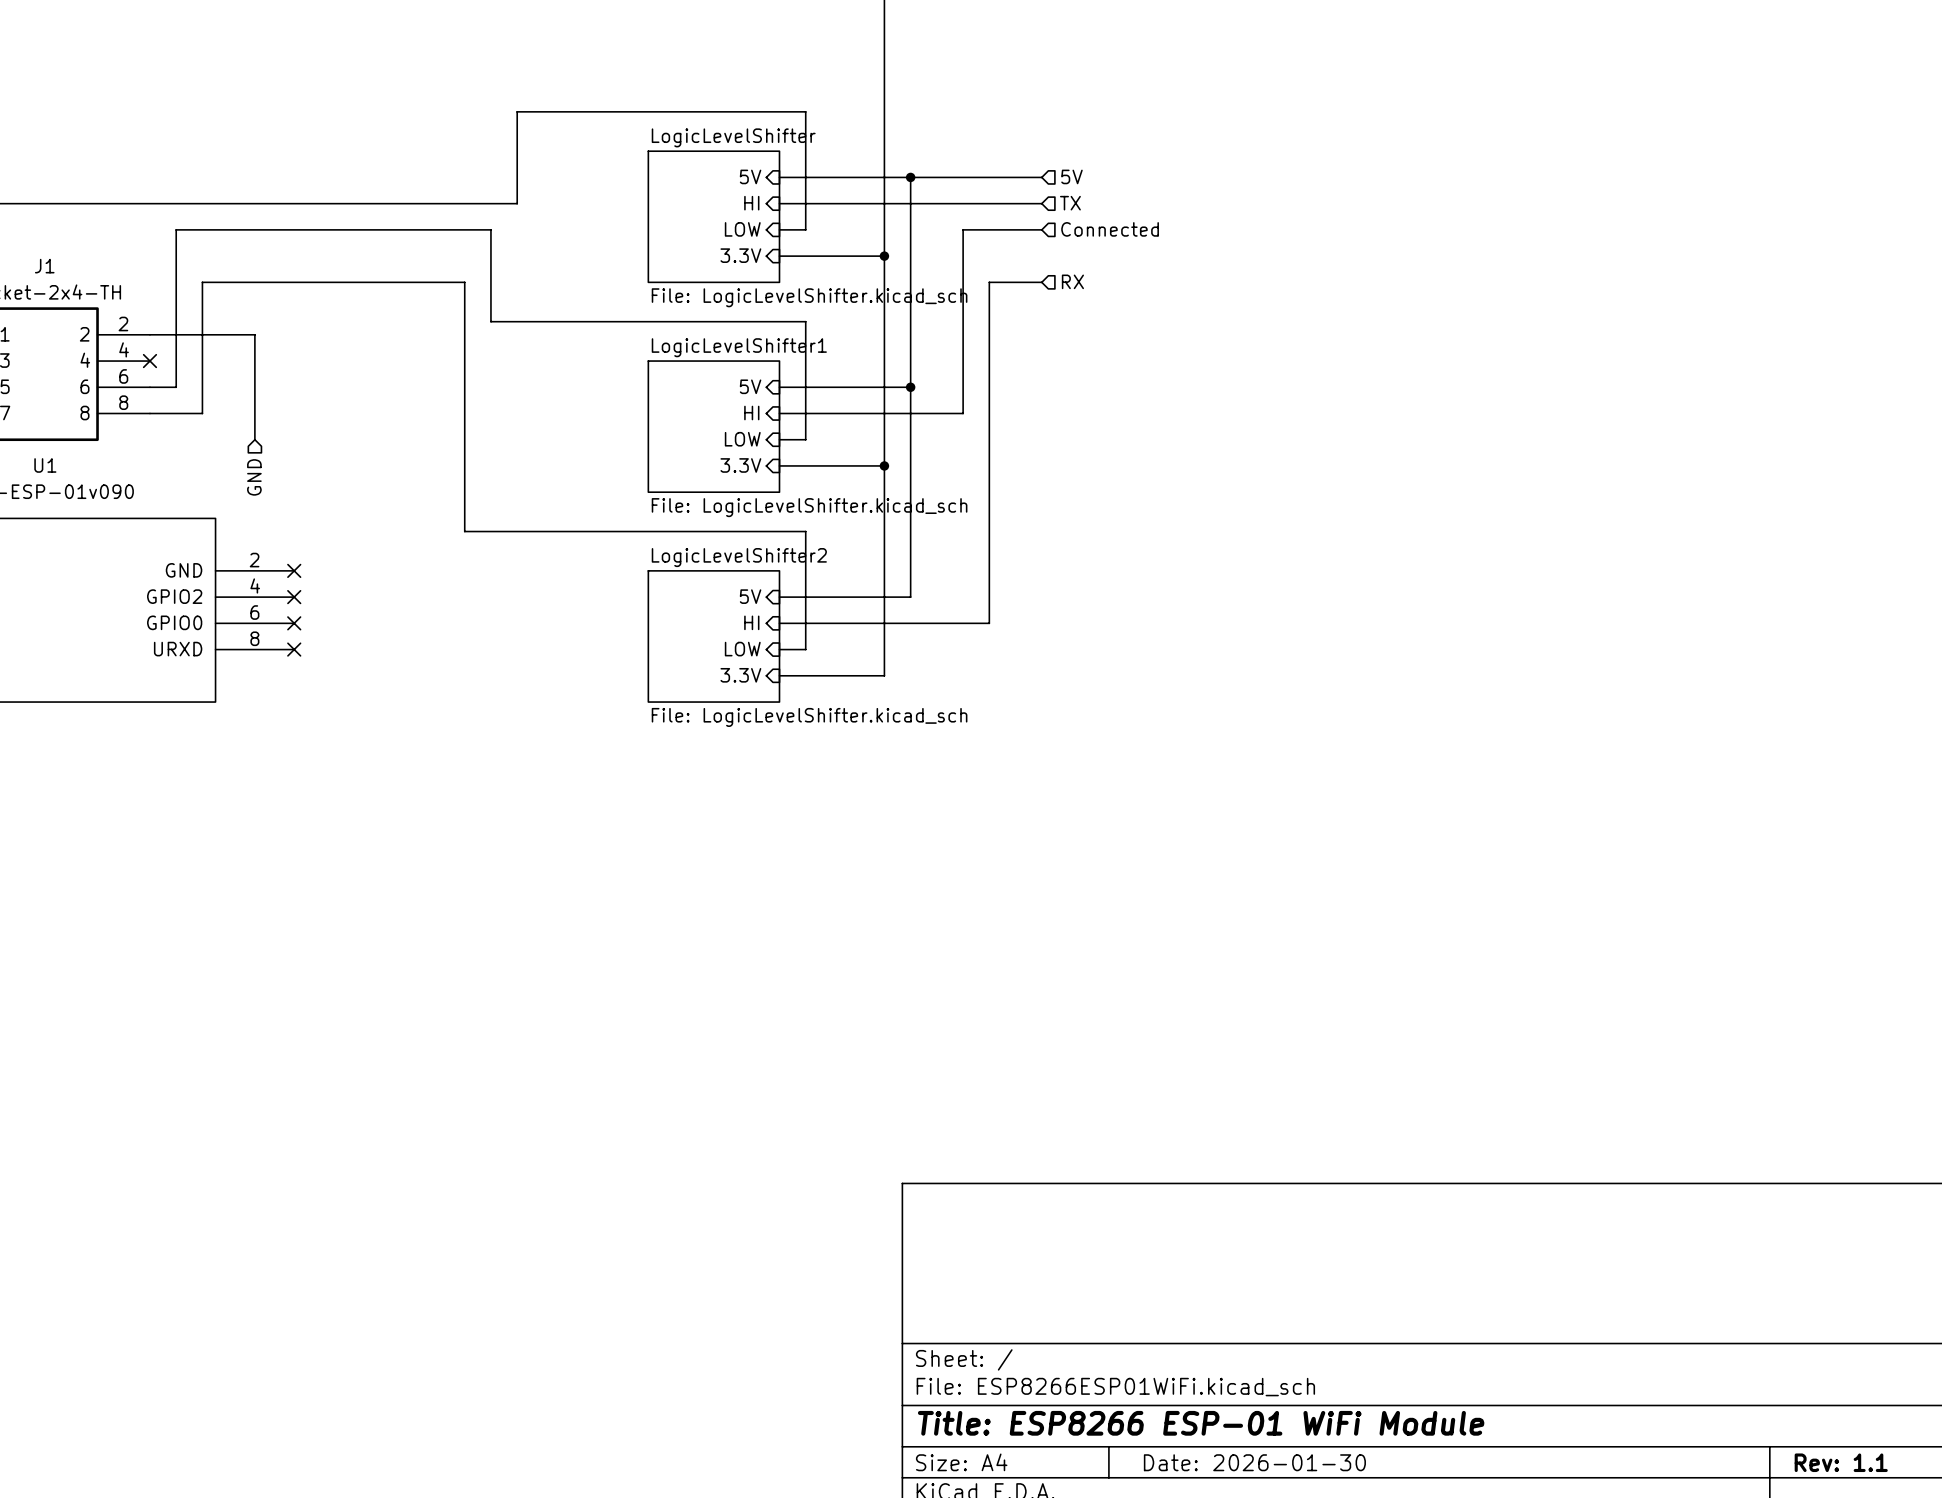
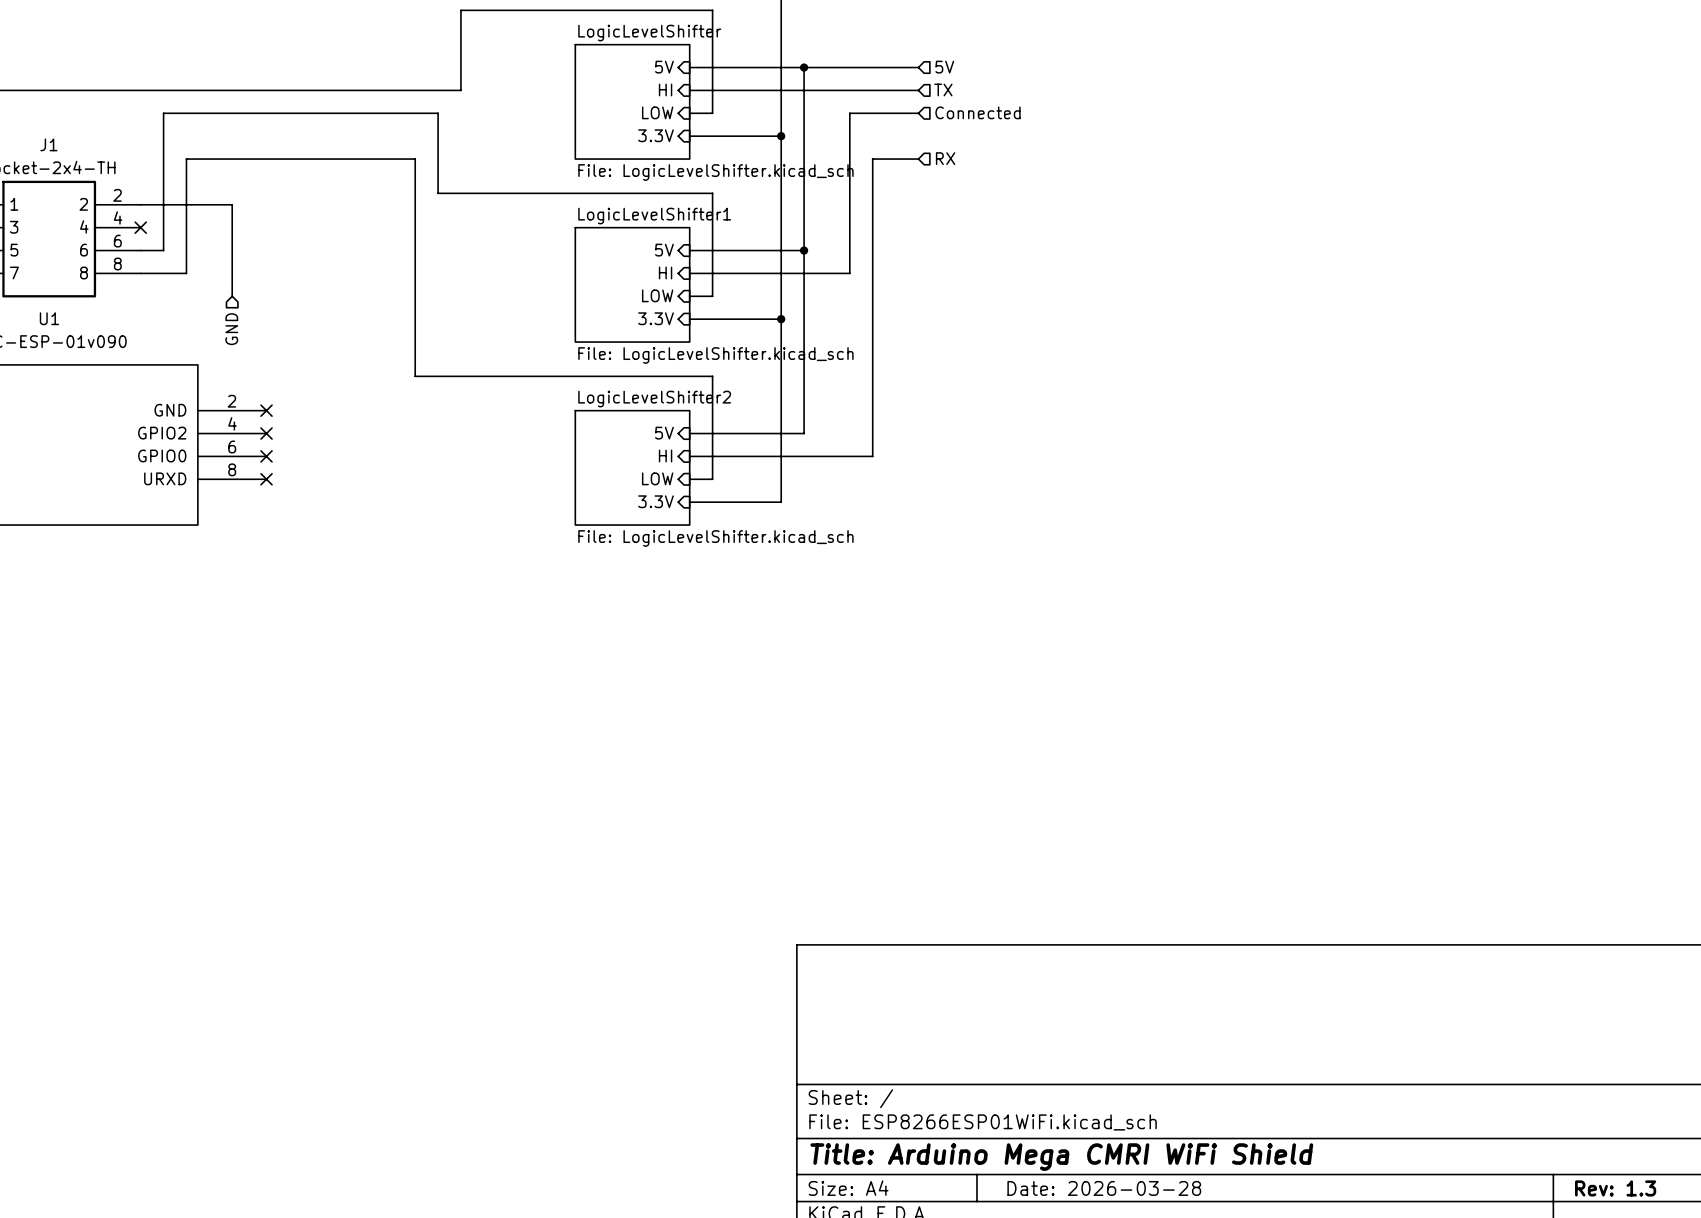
title block: Title: ESP8266 ESP-01 WiFi Module (1201, 1423) -> Title: Arduino Mega CMRI WiFi Shield (1061, 1157)
title block: Date: 2026-01-30 (1254, 1462) -> Date: 2026-03-28 (1104, 1188)
title block: Rev: 1.1 (1841, 1462) -> Rev: 1.3 (1615, 1188)

